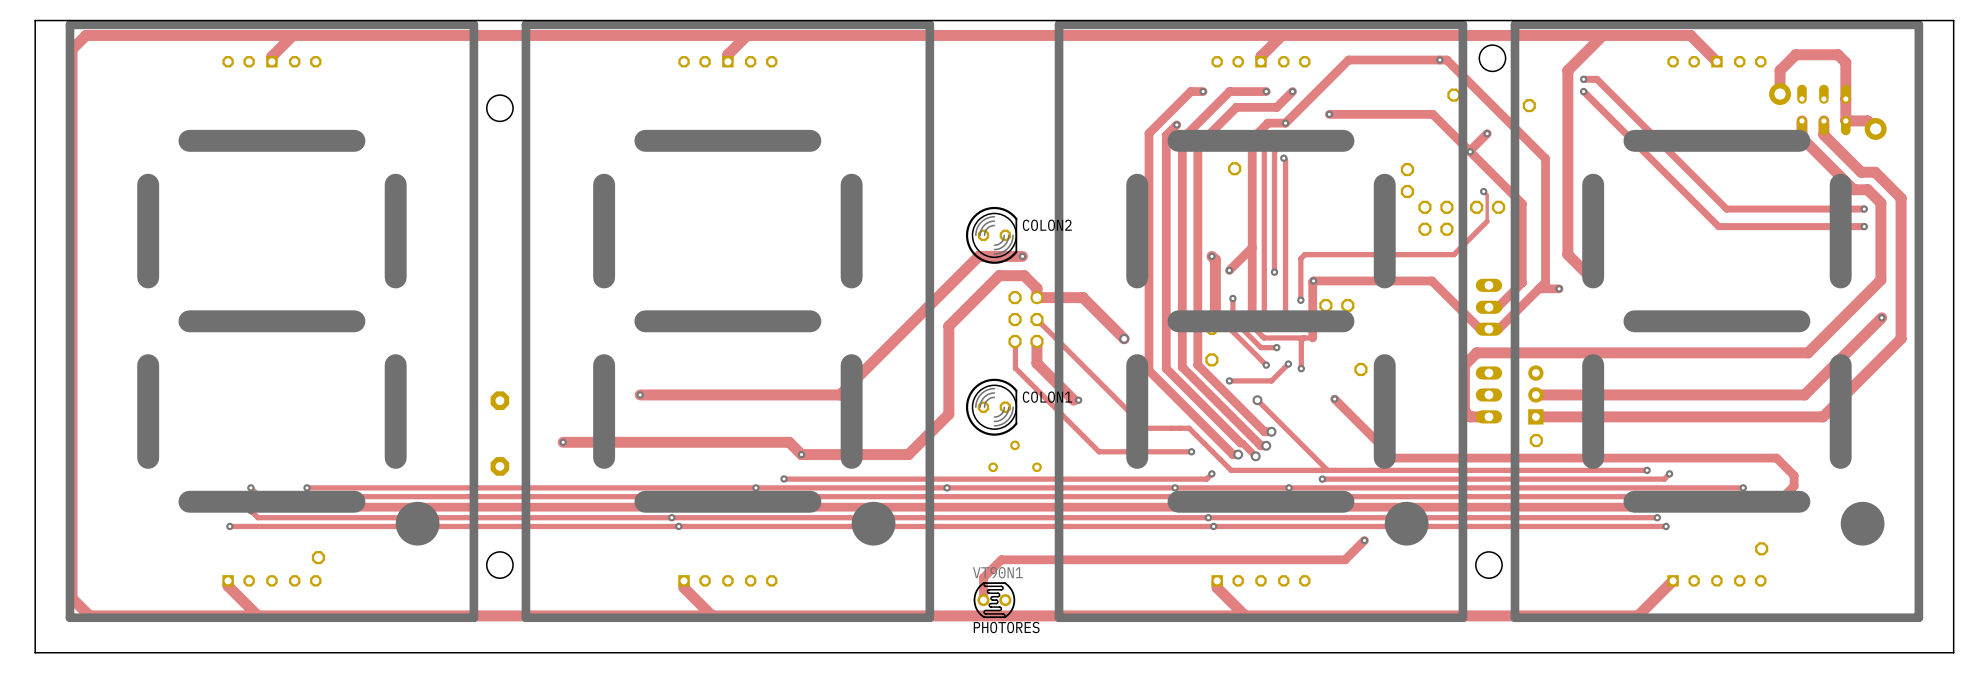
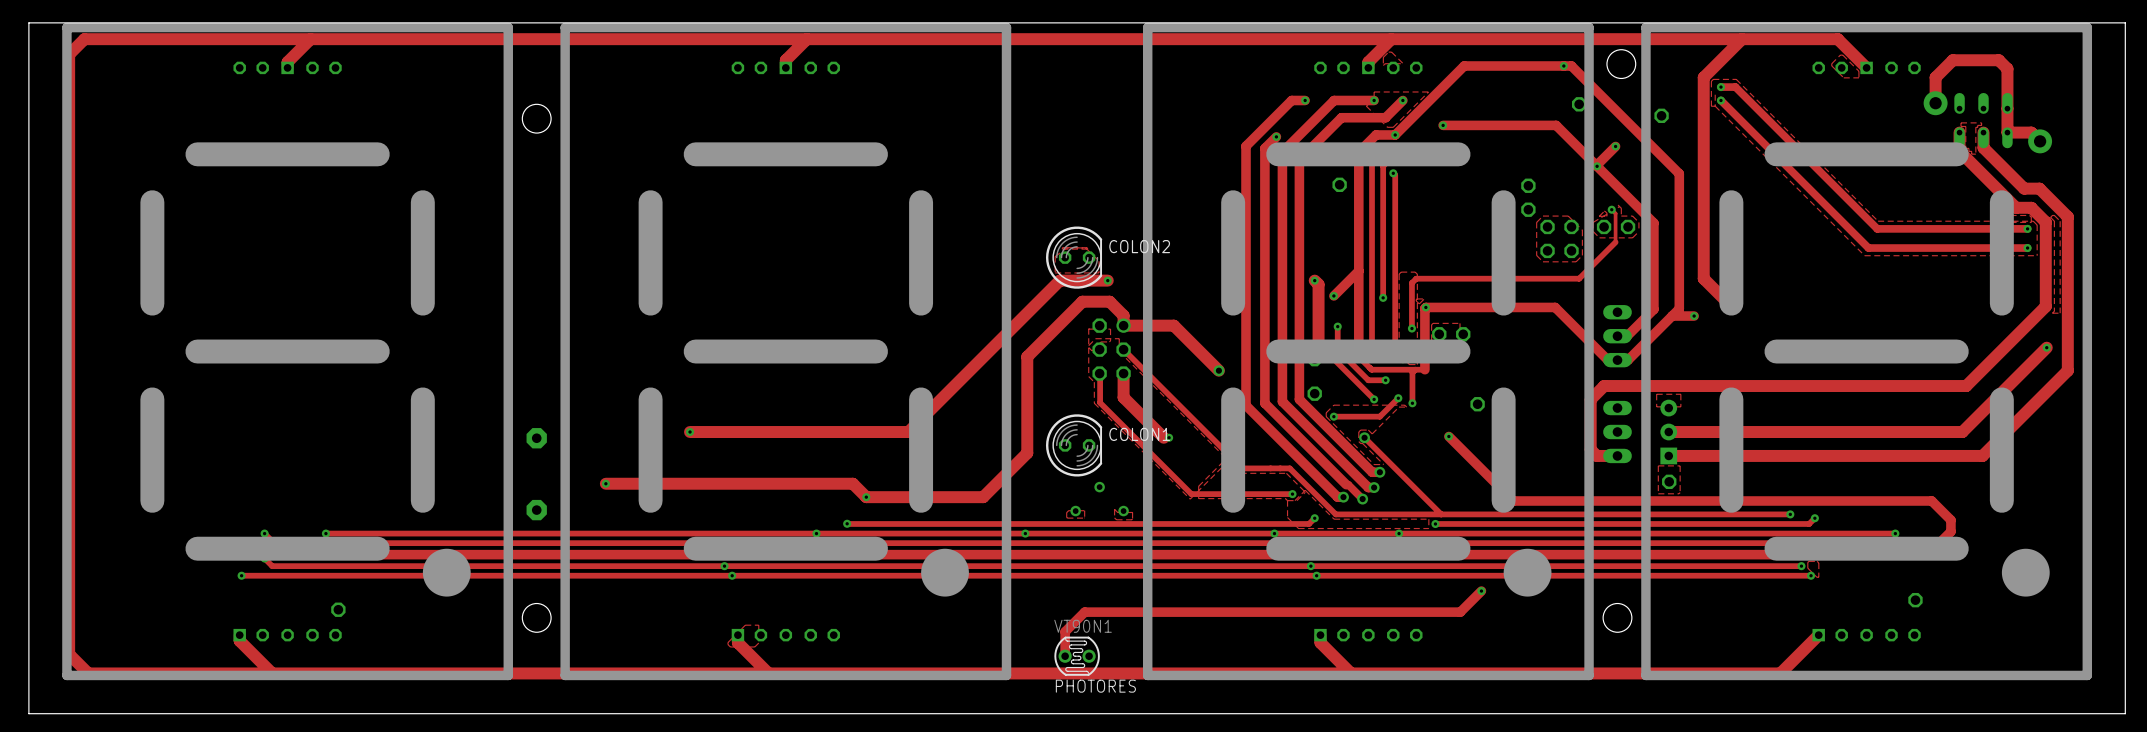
zone outline: none -> (1388, 52) (1391, 52) (1403, 63) (1385, 63) (1383, 65) (1383, 57) (1388, 52)
zone outline: none -> (1840, 55) (1831, 65) (1843, 77) (1858, 77) (1858, 71) (1842, 55) (1840, 55)
zone outline: none -> (1374, 91) (1428, 91) (1393, 127) (1387, 127) (1366, 106) (1374, 98) (1374, 91)
zone outline: none -> (1715, 94) (1715, 106)
zone outline: none -> (1715, 106) (1864, 255) (2037, 255) (2037, 225) (2033, 221) (1878, 221) (1736, 79) (1713, 79) (1711, 81) (1711, 106) (1715, 106)
zone outline: none -> (1960, 122) (1981, 122) (1981, 125) (1975, 127) (1975, 154) (1971, 154) (1968, 148) (1965, 148) (1965, 126) (1960, 126) (1960, 122)
zone outline: none -> (1618, 205) (1621, 208) (1621, 216) (1632, 216) (1638, 222) (1638, 231) (1632, 237) (1599, 237) (1593, 231) (1593, 222) (1619, 206)
zone outline: none -> (1604, 211) (1599, 216) (1606, 216) (1607, 213) (1604, 211)
zone outline: none -> (2010, 215) (2030, 215) (2031, 222) (2010, 222) (2010, 215)
zone outline: none -> (2052, 215) (2060, 221) (2060, 313) (2052, 313) (2054, 311) (2054, 221) (2050, 217) (2052, 215)
zone outline: none -> (1543, 216) (1568, 216) (1582, 230) (1582, 255) (1576, 261) (1543, 261) (1536, 255) (1536, 222) (1543, 216)
zone outline: none -> (1062, 247) (1086, 247) (1087, 248) (1062, 249) (1062, 247)
zone outline: none -> (1067, 247) (1055, 256) (1055, 272) (1099, 272) (1099, 261) (1085, 248) (1067, 247)
zone outline: none -> (1401, 272) (1415, 272) (1417, 274) (1417, 364) (1409, 364) (1407, 362) (1407, 355) (1399, 347) (1399, 274) (1401, 272)
zone outline: none -> (1416, 298) (1424, 298) (1419, 303) (1416, 300) (1416, 298)
zone outline: none -> (1088, 345) (1095, 338) (1119, 338) (1119, 351) (1228, 460) (1190, 499) (1094, 403) (1094, 382) (1088, 376) (1088, 328) (1110, 329) (1110, 340) (1109, 341) (1101, 341) (1092, 350) (1088, 347)
zone outline: none -> (1431, 345) (1433, 323) (1460, 323) (1460, 345) (1431, 345)
zone outline: none -> (1656, 394) (1656, 406) (1680, 406) (1680, 394) (1656, 394)
zone outline: none -> (1333, 405) (1404, 405) (1406, 407) (1399, 407) (1372, 433) (1368, 430) (1360, 430) (1358, 432) (1358, 441) (1383, 464) (1374, 464) (1326, 416) (1326, 412) (1333, 405)
zone outline: none -> (1658, 465) (1658, 493) (1678, 493) (1680, 465) (1658, 465)
zone outline: none -> (1287, 500) (1297, 500) (1305, 492) (1286, 473) (1240, 473) (1228, 460) (1224, 460) (1198, 486) (1198, 498) (1285, 498) (1287, 500)
zone outline: none -> (1287, 500) (1287, 517) (1298, 528) (1428, 528) (1428, 519) (1334, 519) (1305, 490) (1294, 500)
zone outline: none -> (1114, 509) (1114, 517) (1116, 519) (1132, 519) (1132, 512) (1117, 512) (1114, 509)
zone outline: none -> (1068, 510) (1066, 512) (1067, 518) (1084, 517) (1084, 510) (1068, 510)
zone outline: none -> (1808, 561) (1818, 563) (1818, 577) (1807, 568) (1808, 561)
zone outline: none -> (745, 625) (758, 625) (758, 643) (754, 646) (730, 646) (727, 642) (745, 625)

